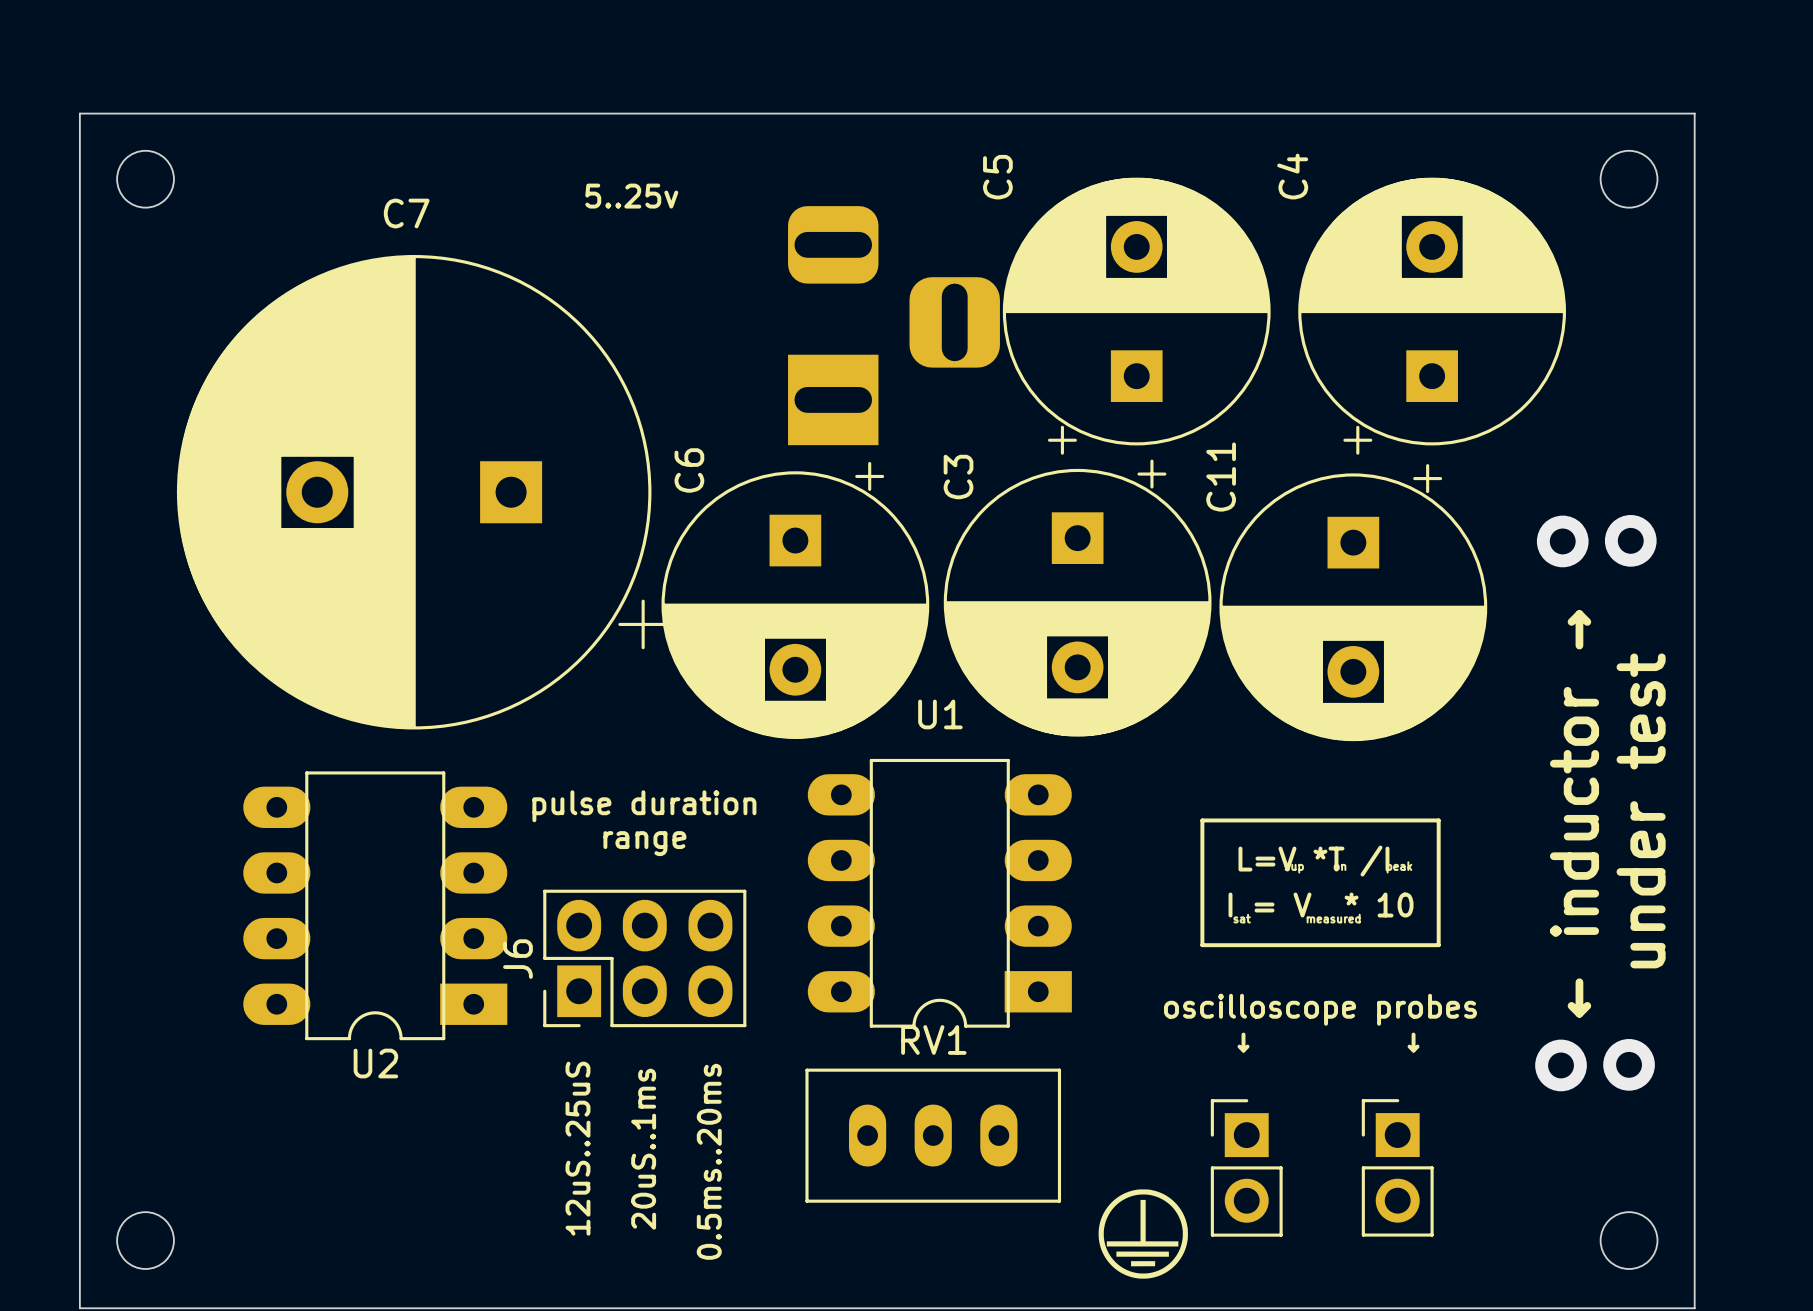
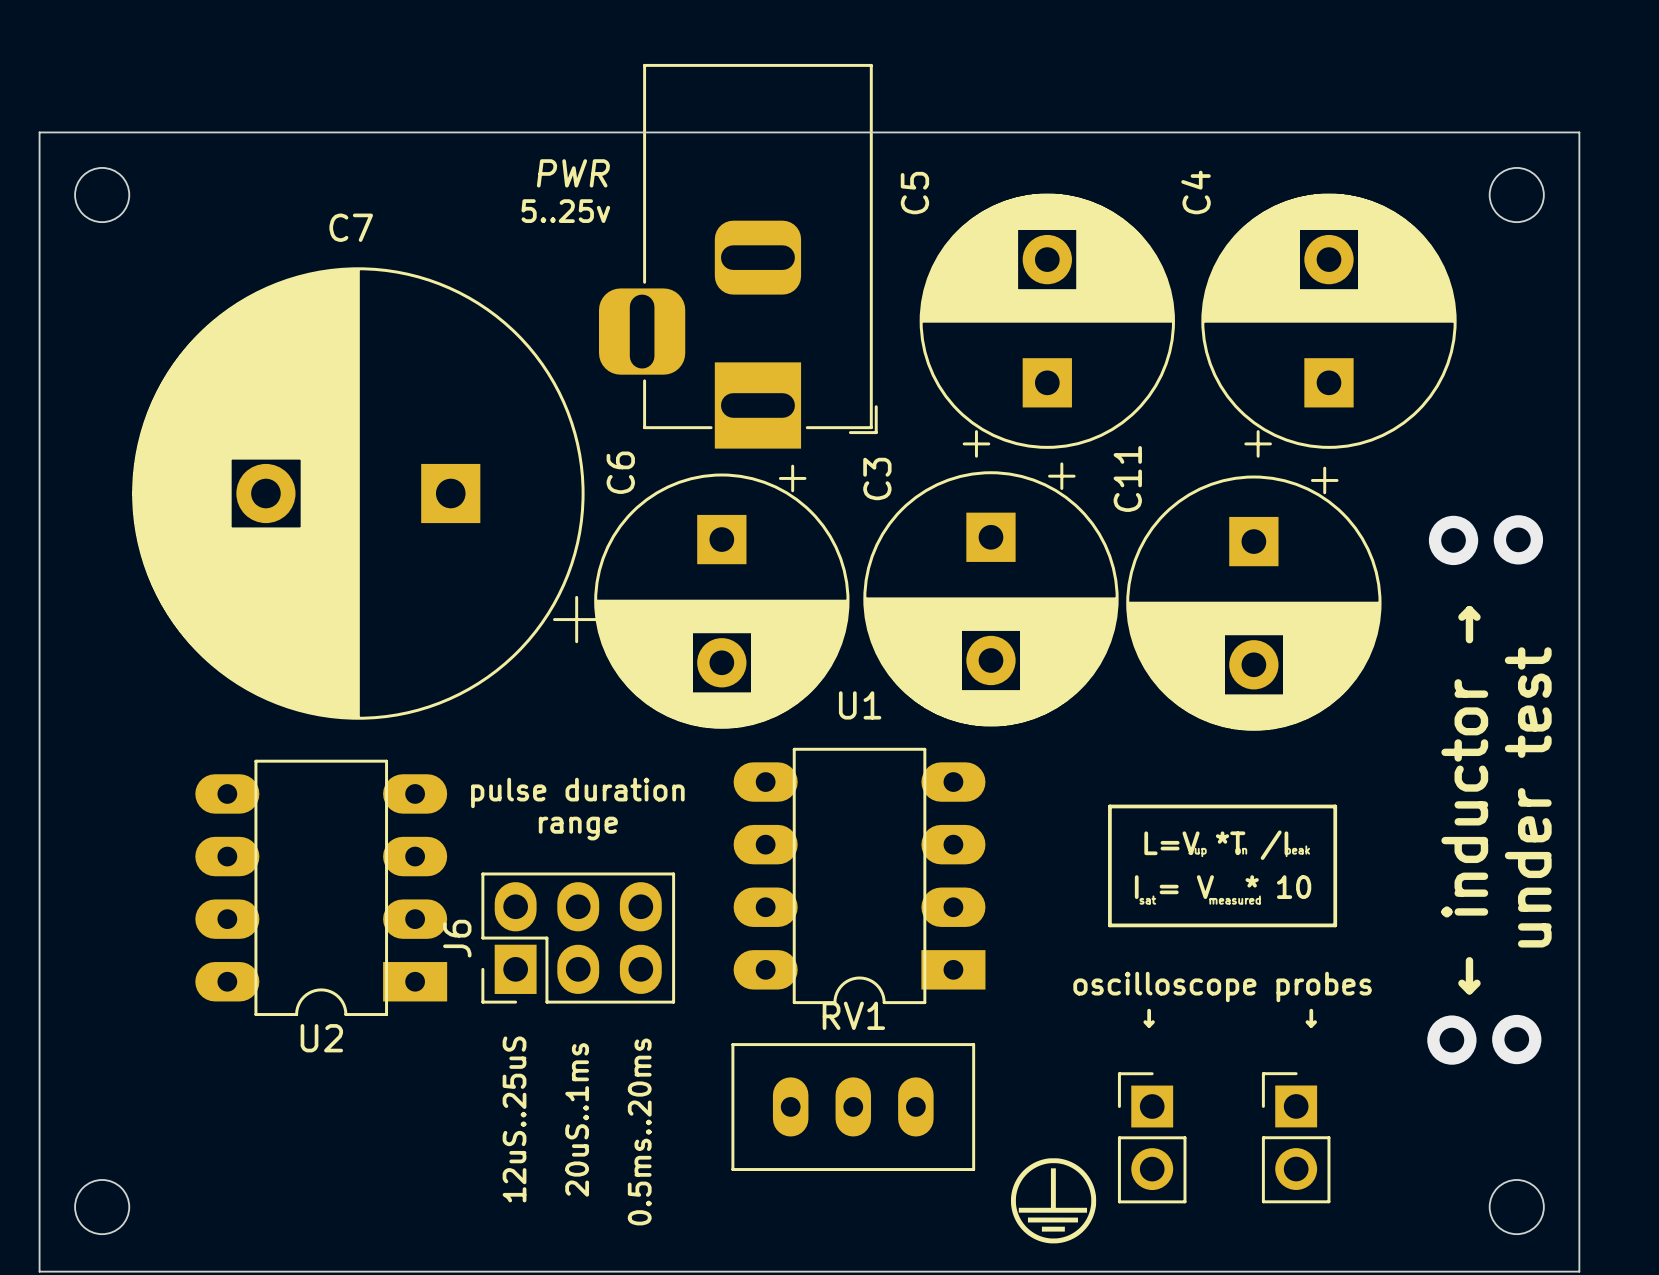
part side: bottom (893, 325) -> top (738, 256)

